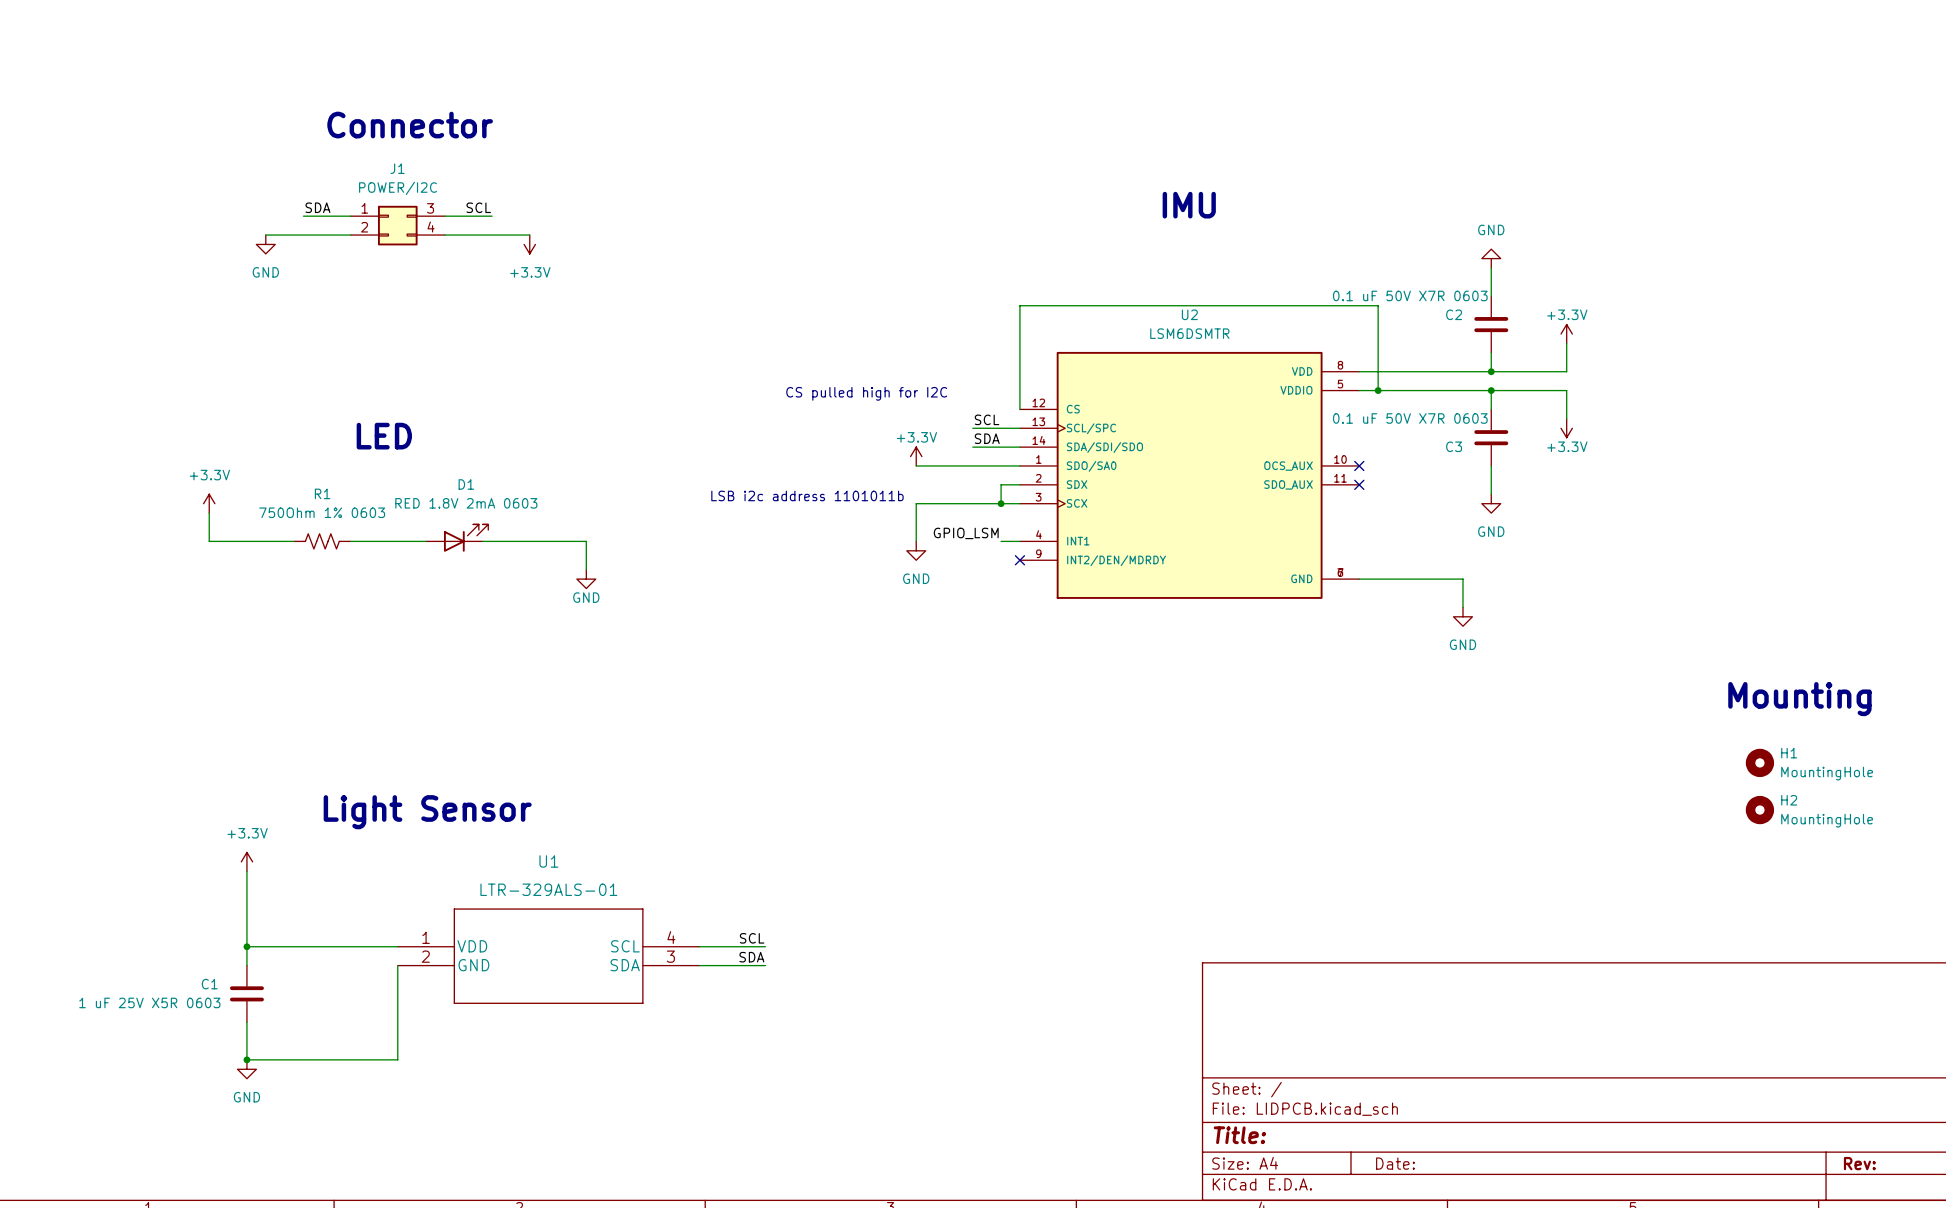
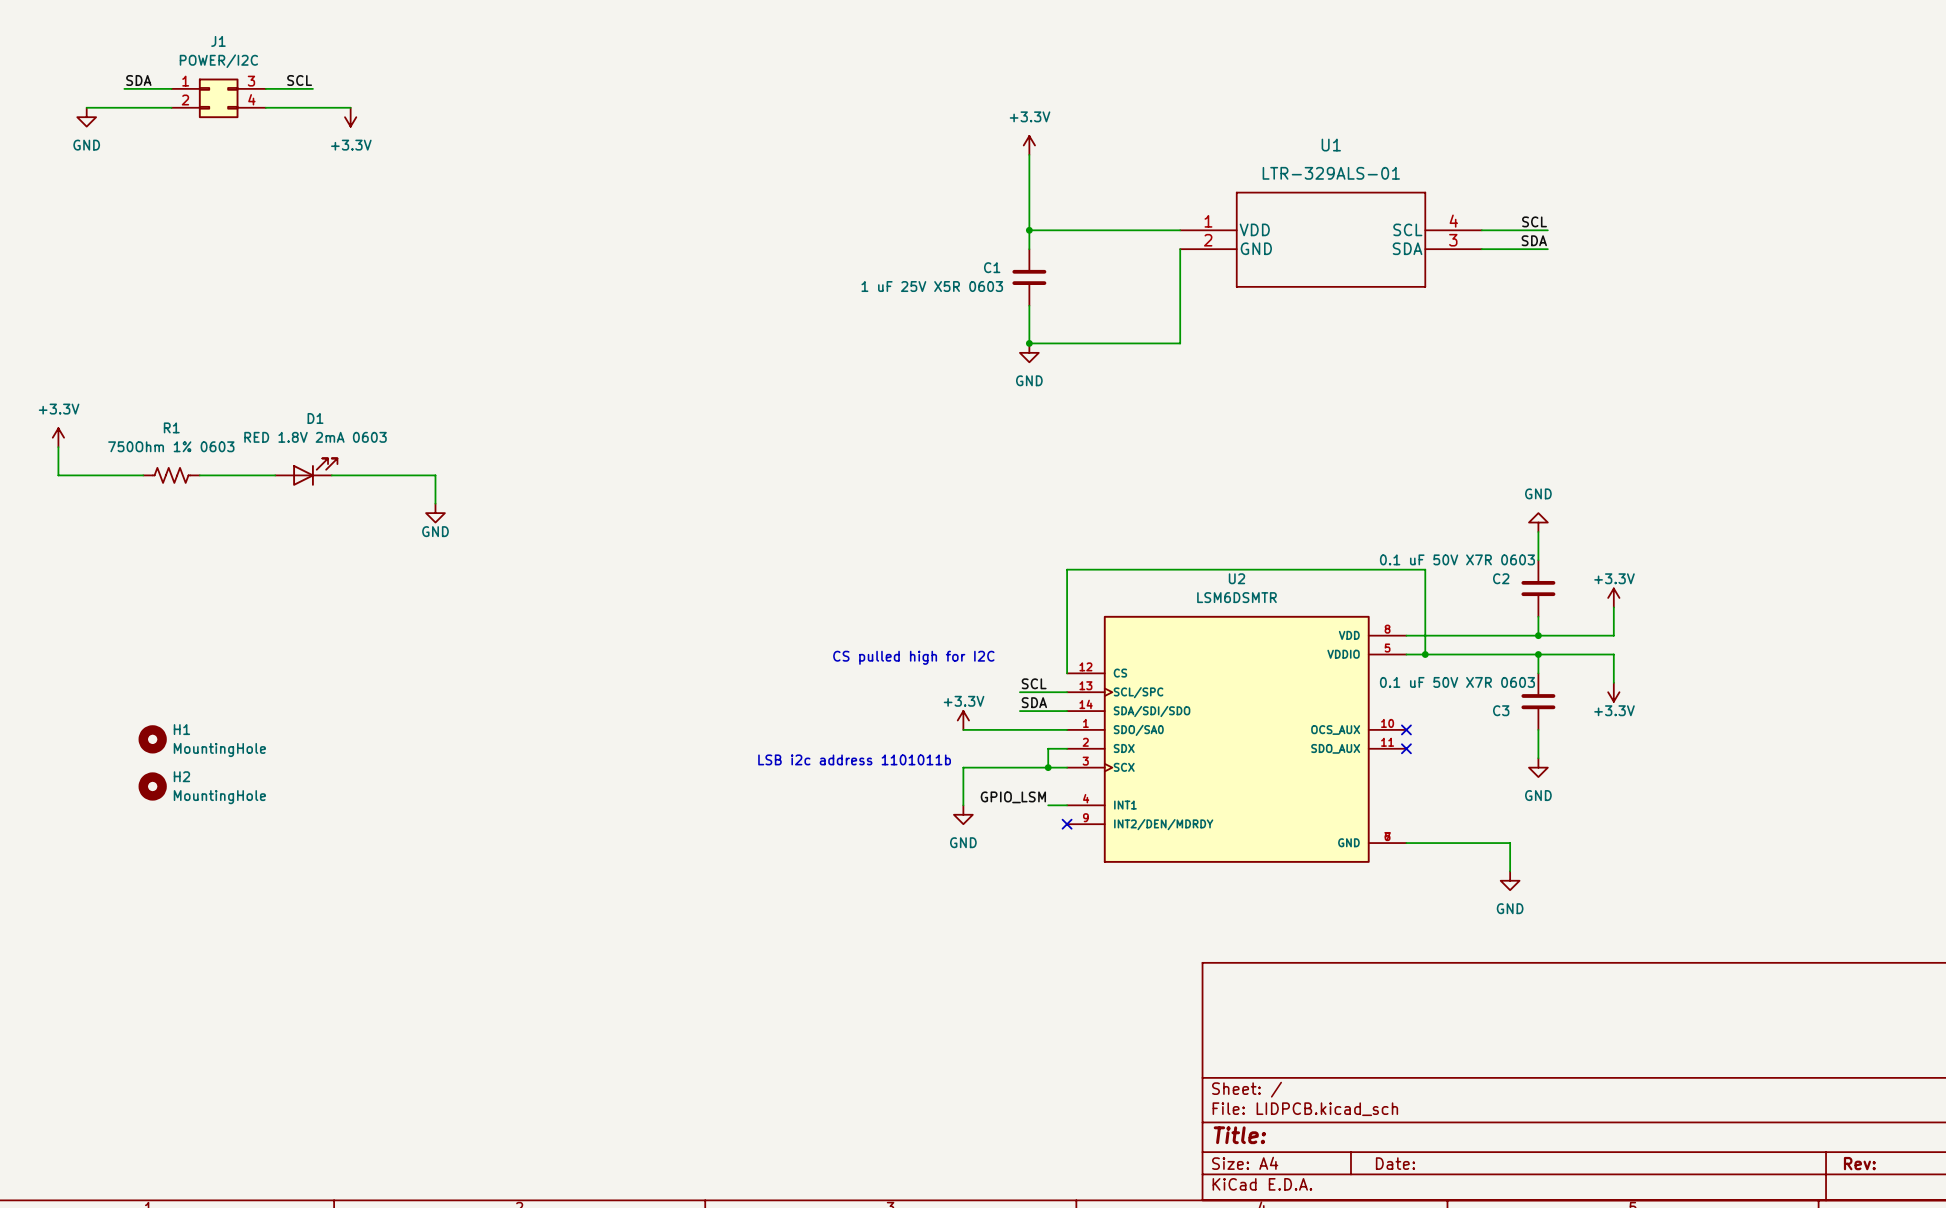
label: none -> SDA (138, 80)
label: none -> SCL (299, 80)
wire: none -> (124, 88) (171, 88)
wire: none -> (86, 107) (171, 107)
power symbol: none -> GND (86, 117)
power symbol: none -> +3.3V (350, 117)
text: Connector (410, 125) -> none
power symbol: none -> +3.3V (1029, 145)
wire: none -> (1029, 154) (1029, 249)
text: IMU (1189, 205) -> none
label: SDA (317, 207) -> none
label: SCL (478, 207) -> none
wire: (303, 216) (350, 216) -> (265, 88) (312, 88)
wire: (444, 216) (492, 216) -> none
label: none -> SCL (1534, 221)
J1 position: (397, 225) -> (218, 98)
wire: none -> (1029, 230) (1180, 230)
junction: none -> (1029, 230)
wire: none -> (1481, 230) (1547, 230)
wire: (265, 235) (350, 235) -> (265, 107) (350, 107)
wire: (444, 235) (529, 235) -> none
label: none -> SDA (1534, 240)
power symbol: GND (265, 244) -> none
power symbol: +3.3V (529, 244) -> none
wire: none -> (1180, 249) (1180, 343) (1029, 343) (1029, 305)
wire: none -> (1481, 249) (1547, 249)
power symbol: GND (1491, 258) -> none
wire: (1491, 268) (1491, 296) -> none
C2 position: (1491, 324) -> (1538, 588)
power symbol: +3.3V (1566, 334) -> none
junction: none -> (1029, 343)
wire: (1566, 343) (1566, 371) (1359, 371) -> none
power symbol: none -> GND (1029, 352)
wire: (1491, 352) (1491, 371) -> none
junction: (1491, 371) -> none
wire: (1359, 390) (1566, 390) (1566, 418) -> none
wire: (1378, 390) (1378, 305) (1019, 305) (1019, 409) -> none
junction: (1378, 390) -> none
wire: (1491, 390) (1491, 409) -> none
junction: (1491, 390) -> none
text: CS pulled high for I2C (866, 393) -> none
label: SCL (987, 419) -> none
wire: (972, 428) (1019, 428) -> none
power symbol: +3.3V (1566, 428) -> none
text: LED (384, 436) -> none
C3 position: (1491, 437) -> (1538, 701)
label: SDA (987, 438) -> none
wire: (972, 447) (1019, 447) -> none
power symbol: +3.3V (916, 456) -> none
wire: (916, 465) (1019, 465) -> none
no-connect mark: (1359, 465) -> none
wire: (1491, 465) (1491, 494) -> (1538, 531) (1538, 560)
U2 position: (1189, 475) -> (1236, 739)
wire: (1019, 484) (1001, 484) (1001, 503) -> none
no-connect mark: (1359, 484) -> none
text: LSB i2c address 1101011b (807, 495) -> none
power symbol position: +3.3V (209, 503) -> +3.3V (58, 437)
junction: (1001, 503) -> none
wire: (1019, 503) (916, 503) (916, 541) -> none
power symbol rotation: 0° (1491, 503) -> 180° (1538, 522)
power symbol position: GND (1491, 503) -> GND (1538, 522)
wire: (209, 513) (209, 541) (294, 541) -> (58, 447) (58, 475) (143, 475)
power symbol: none -> GND (435, 513)
label: GPIO_LSM (966, 533) -> none
D1 position: (457, 538) -> (306, 472)
R1 position: (322, 541) -> (171, 475)
wire: (350, 541) (426, 541) -> (199, 475) (275, 475)
wire: (482, 541) (586, 541) (586, 569) -> (331, 475) (435, 475) (435, 503)
wire: (1001, 541) (1019, 541) -> none
power symbol: GND (916, 550) -> none
no-connect mark: (1019, 560) -> none
power symbol: GND (586, 579) -> none
wire: (1359, 579) (1462, 579) (1462, 607) -> none
power symbol: none -> +3.3V (1613, 597)
wire: none -> (1613, 607) (1613, 635) (1406, 635)
power symbol: GND (1462, 616) -> none
wire: none -> (1538, 616) (1538, 635)
junction: none -> (1538, 635)
wire: none -> (1406, 654) (1613, 654) (1613, 682)
wire: none -> (1425, 654) (1425, 569) (1067, 569) (1067, 673)
junction: none -> (1425, 654)
wire: none -> (1538, 654) (1538, 673)
junction: none -> (1538, 654)
text: none -> CS pulled high for I2C (913, 657)
label: none -> SCL (1034, 683)
wire: none -> (1019, 692) (1067, 692)
power symbol: none -> +3.3V (1613, 692)
text: Mounting (1799, 699) -> none
label: none -> SDA (1034, 702)
wire: none -> (1019, 711) (1067, 711)
power symbol: none -> +3.3V (963, 720)
wire: none -> (963, 729) (1067, 729)
no-connect mark: none -> (1406, 729)
wire: none -> (1538, 729) (1538, 758)
wire: none -> (1067, 748) (1048, 748) (1048, 767)
no-connect mark: none -> (1406, 748)
text: none -> LSB i2c address 1101011b (854, 759)
H1 position: (1759, 762) -> (152, 739)
junction: none -> (1048, 767)
wire: none -> (1067, 767) (963, 767) (963, 805)
power symbol: none -> GND (1538, 767)
label: none -> GPIO_LSM (1013, 797)
wire: none -> (1048, 805) (1067, 805)
H2 position: (1759, 810) -> (152, 786)
text: Light Sensor (427, 812) -> none
power symbol: none -> GND (963, 814)
no-connect mark: none -> (1067, 824)
wire: none -> (1406, 843) (1510, 843) (1510, 871)
power symbol: +3.3V (246, 861) -> none
wire: (246, 871) (246, 965) -> none
power symbol: none -> GND (1510, 880)
label: SCL (752, 938) -> none
wire: (246, 946) (397, 946) -> none
junction: (246, 946) -> none
wire: (699, 946) (765, 946) -> none
U1 position: (548, 956) -> (1331, 239)
label: SDA (751, 957) -> none
wire: (397, 965) (397, 1059) (246, 1059) (246, 1022) -> none
wire: (699, 965) (765, 965) -> none
C1 position: (246, 993) -> (1029, 277)
junction: (246, 1059) -> none
power symbol: GND (246, 1069) -> none

